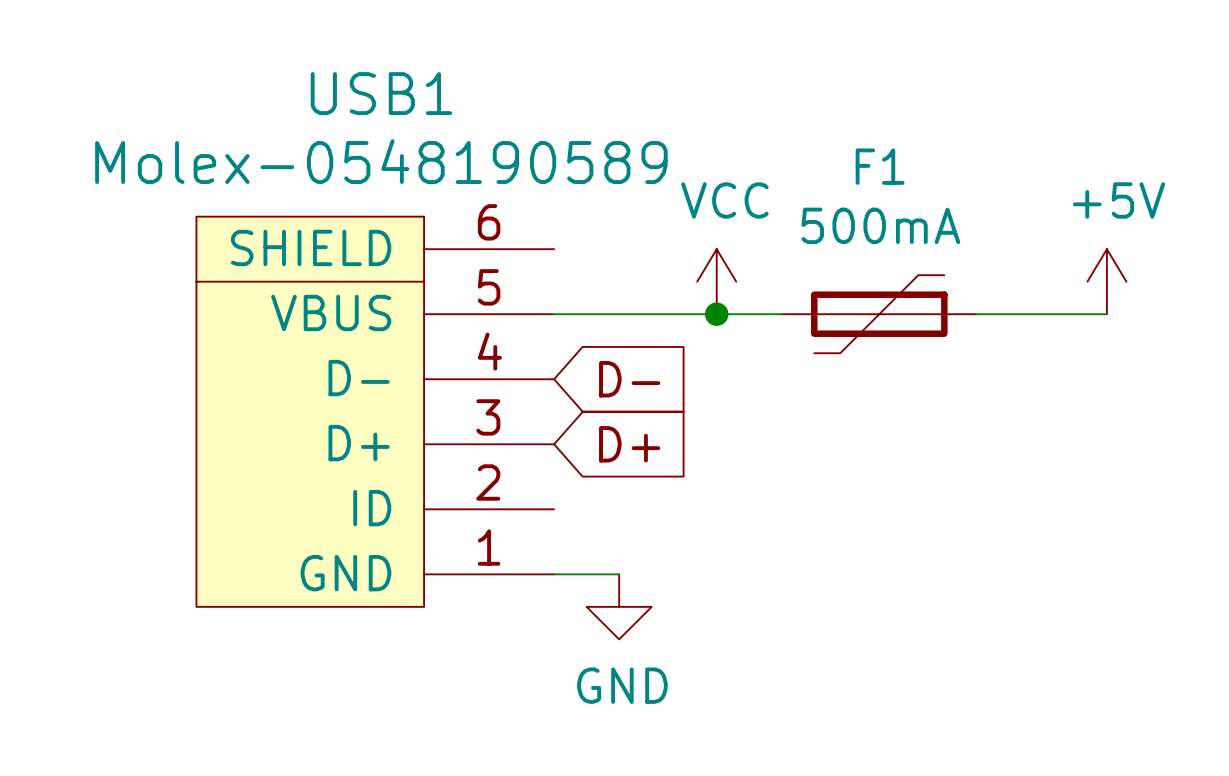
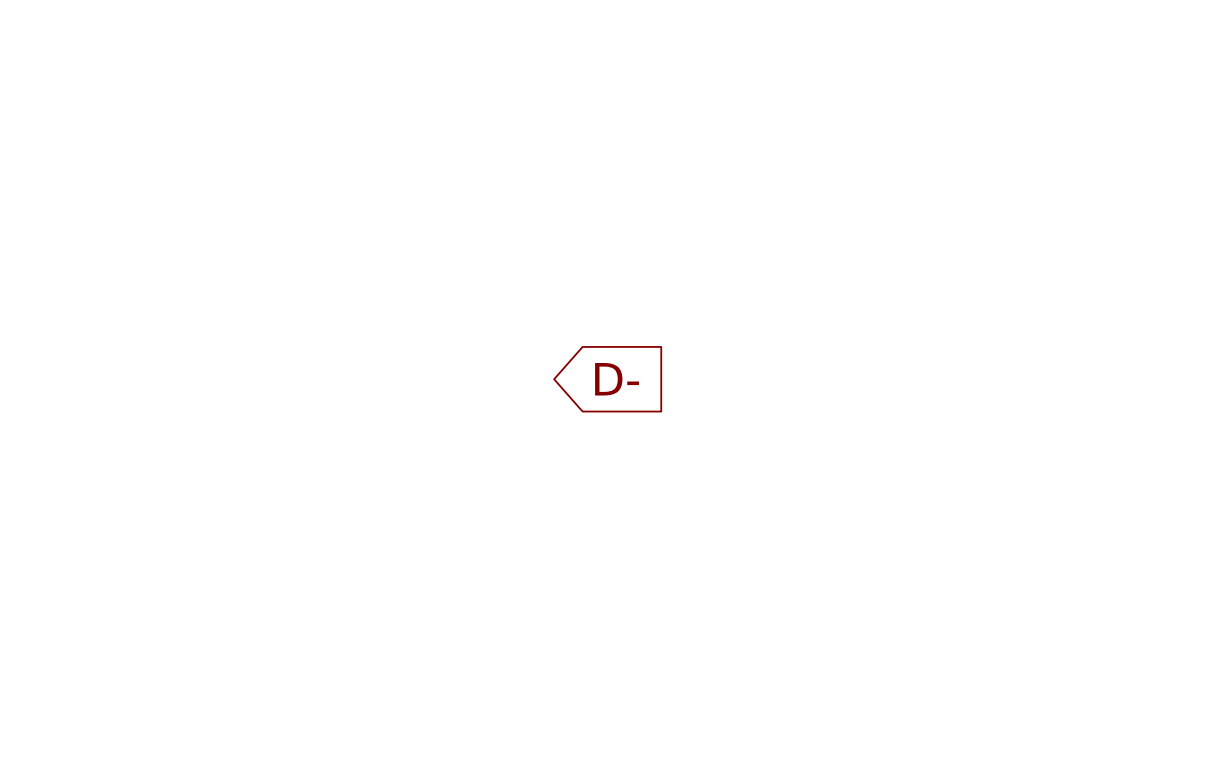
power symbol: VCC (716, 281) -> none
power symbol: +5V (1106, 281) -> none
wire: (554, 314) (781, 314) -> none
junction: (716, 314) -> none
F1: 500mA (879, 314) -> none
wire: (976, 314) (1106, 314) -> none
USB1: Molex-0548190589 (375, 411) -> none
global label: D+ (629, 444) -> none
wire: (554, 574) (619, 574) -> none
power symbol: GND (619, 606) -> none

